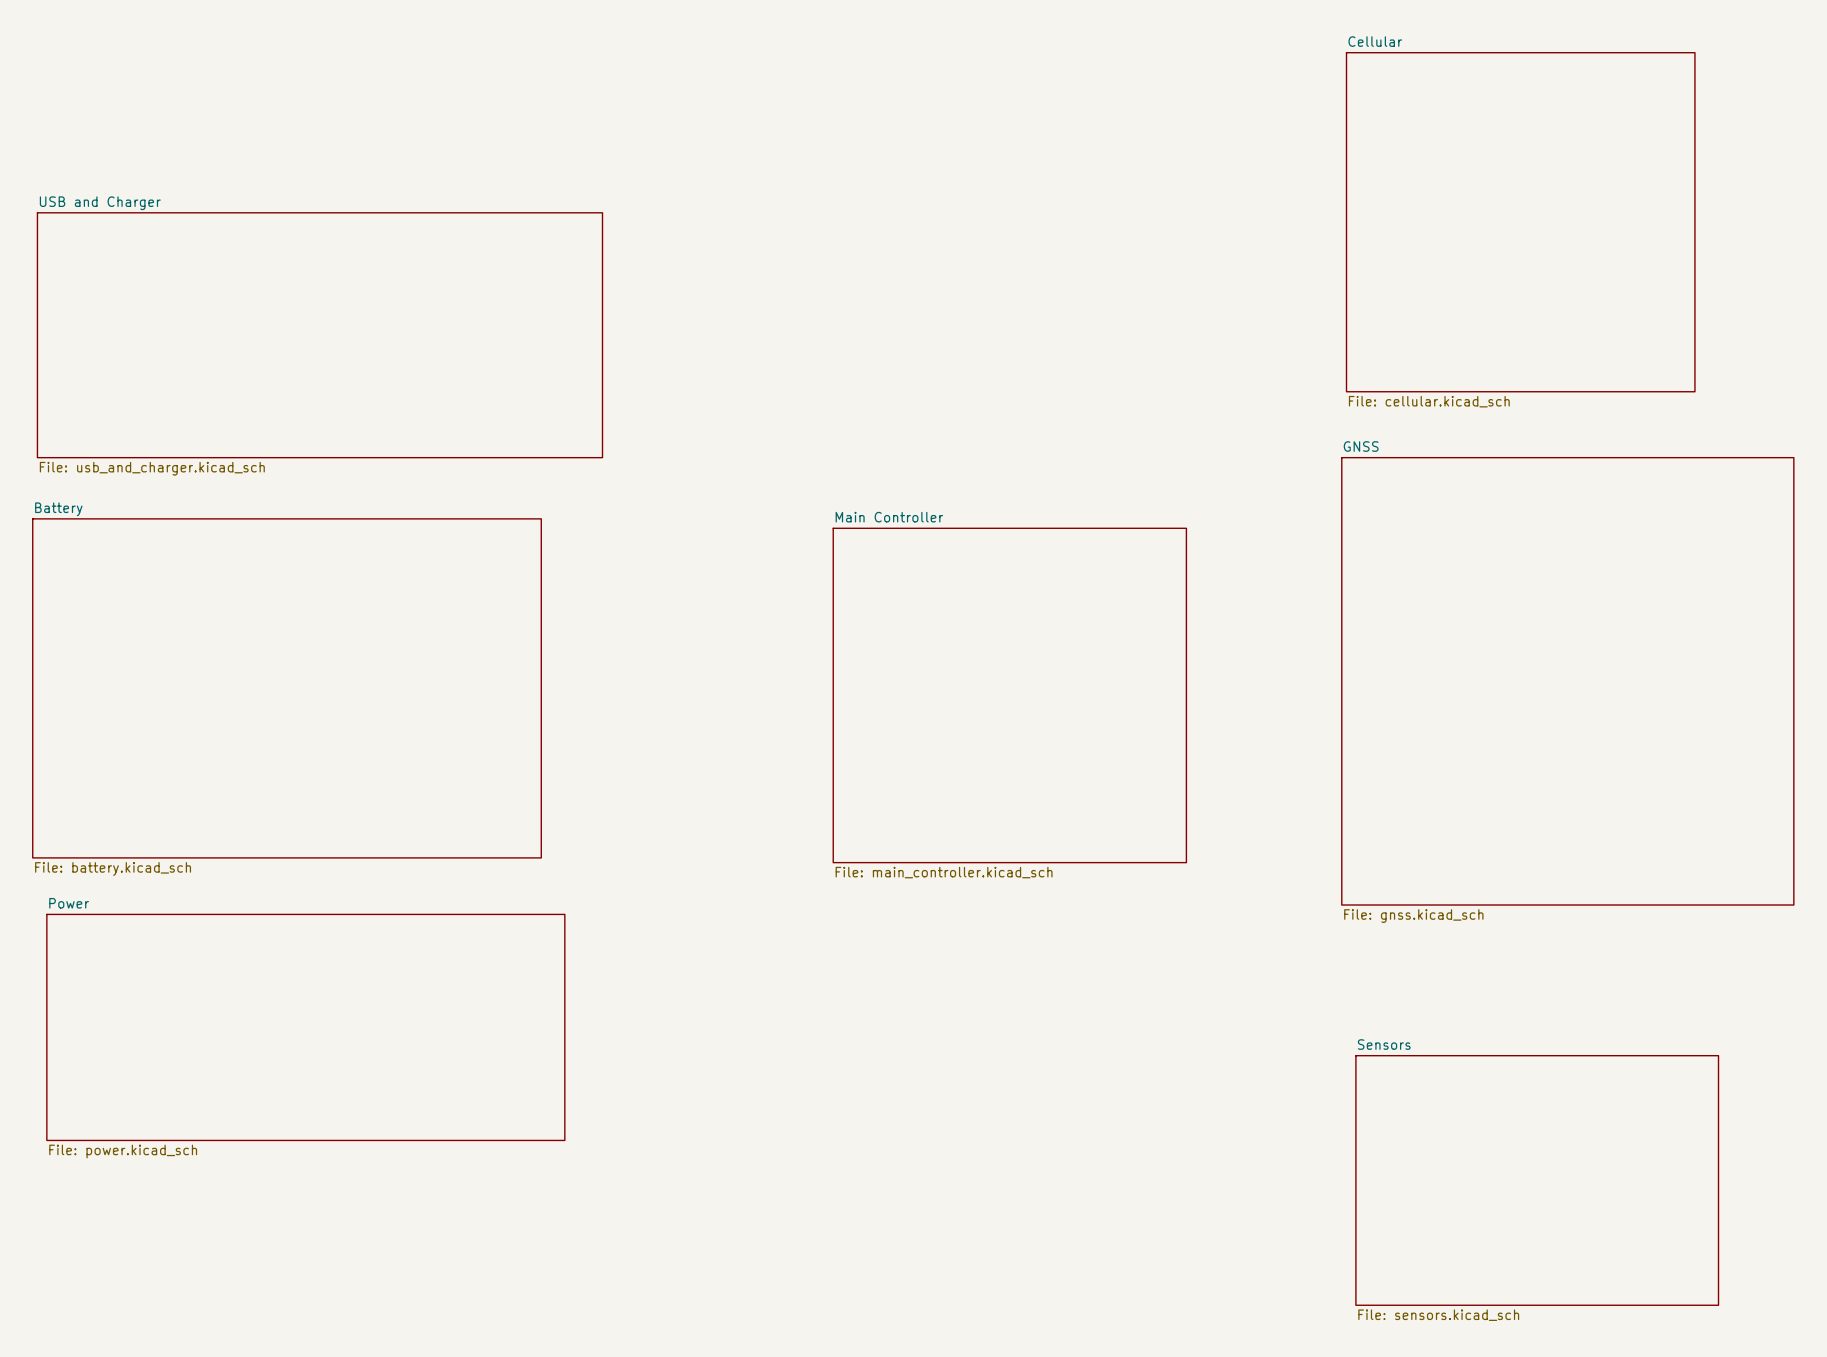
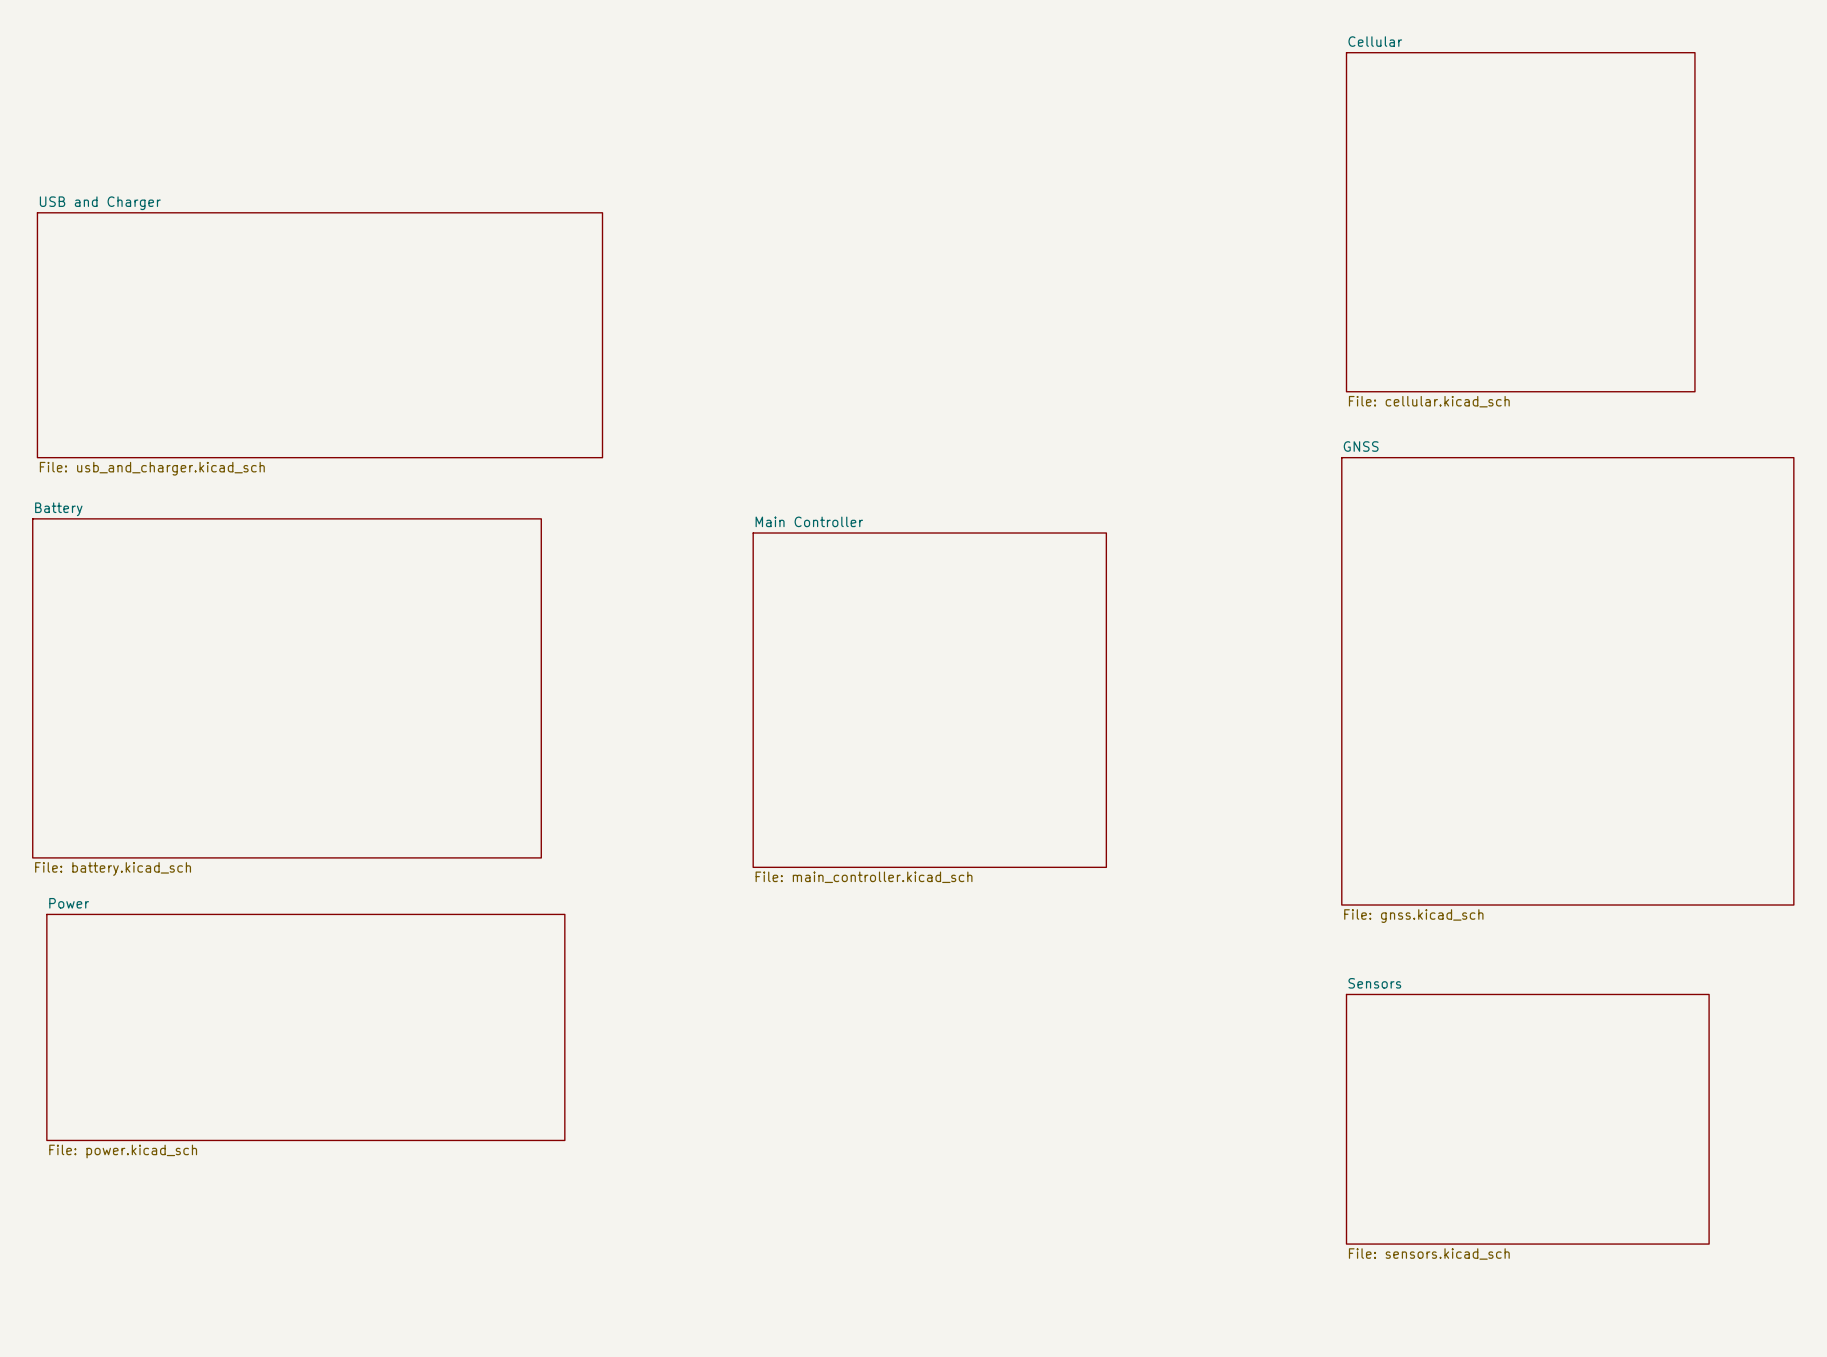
sheet Main Controller position: (1009, 695) -> (929, 700)
sheet Sensors position: (1537, 1180) -> (1527, 1119)

